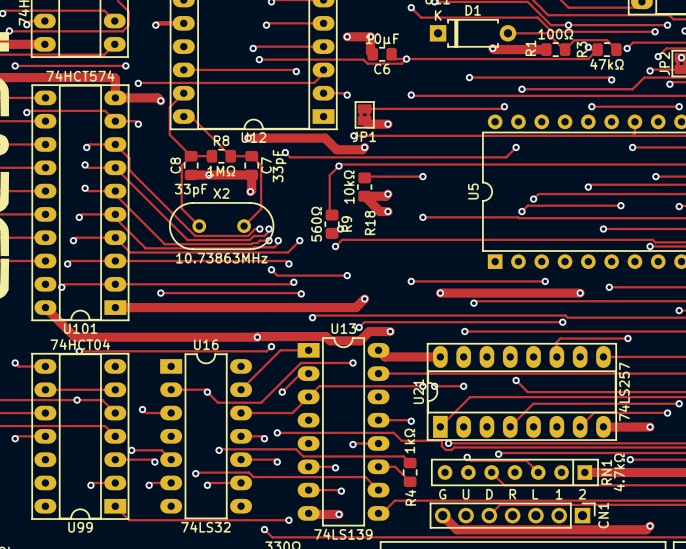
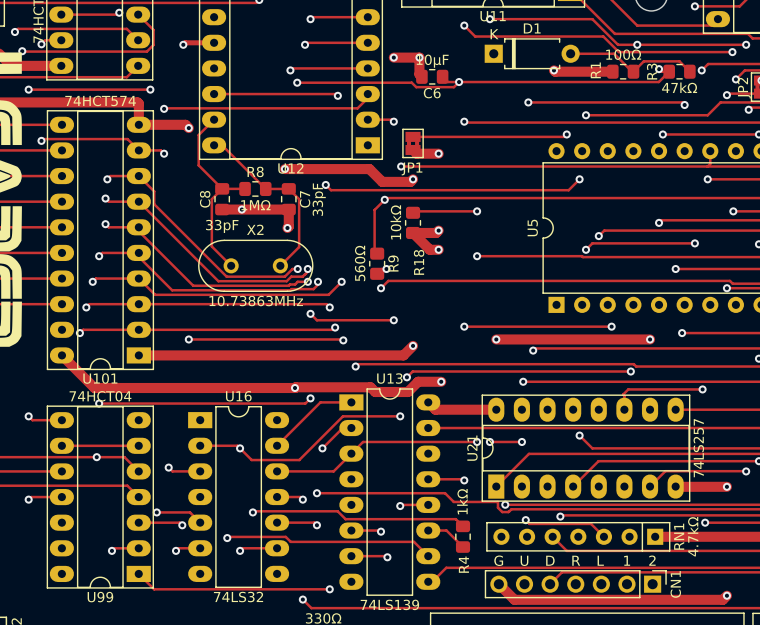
track: (308, 513) (339, 514) -> none
via: (339, 514) -> none

